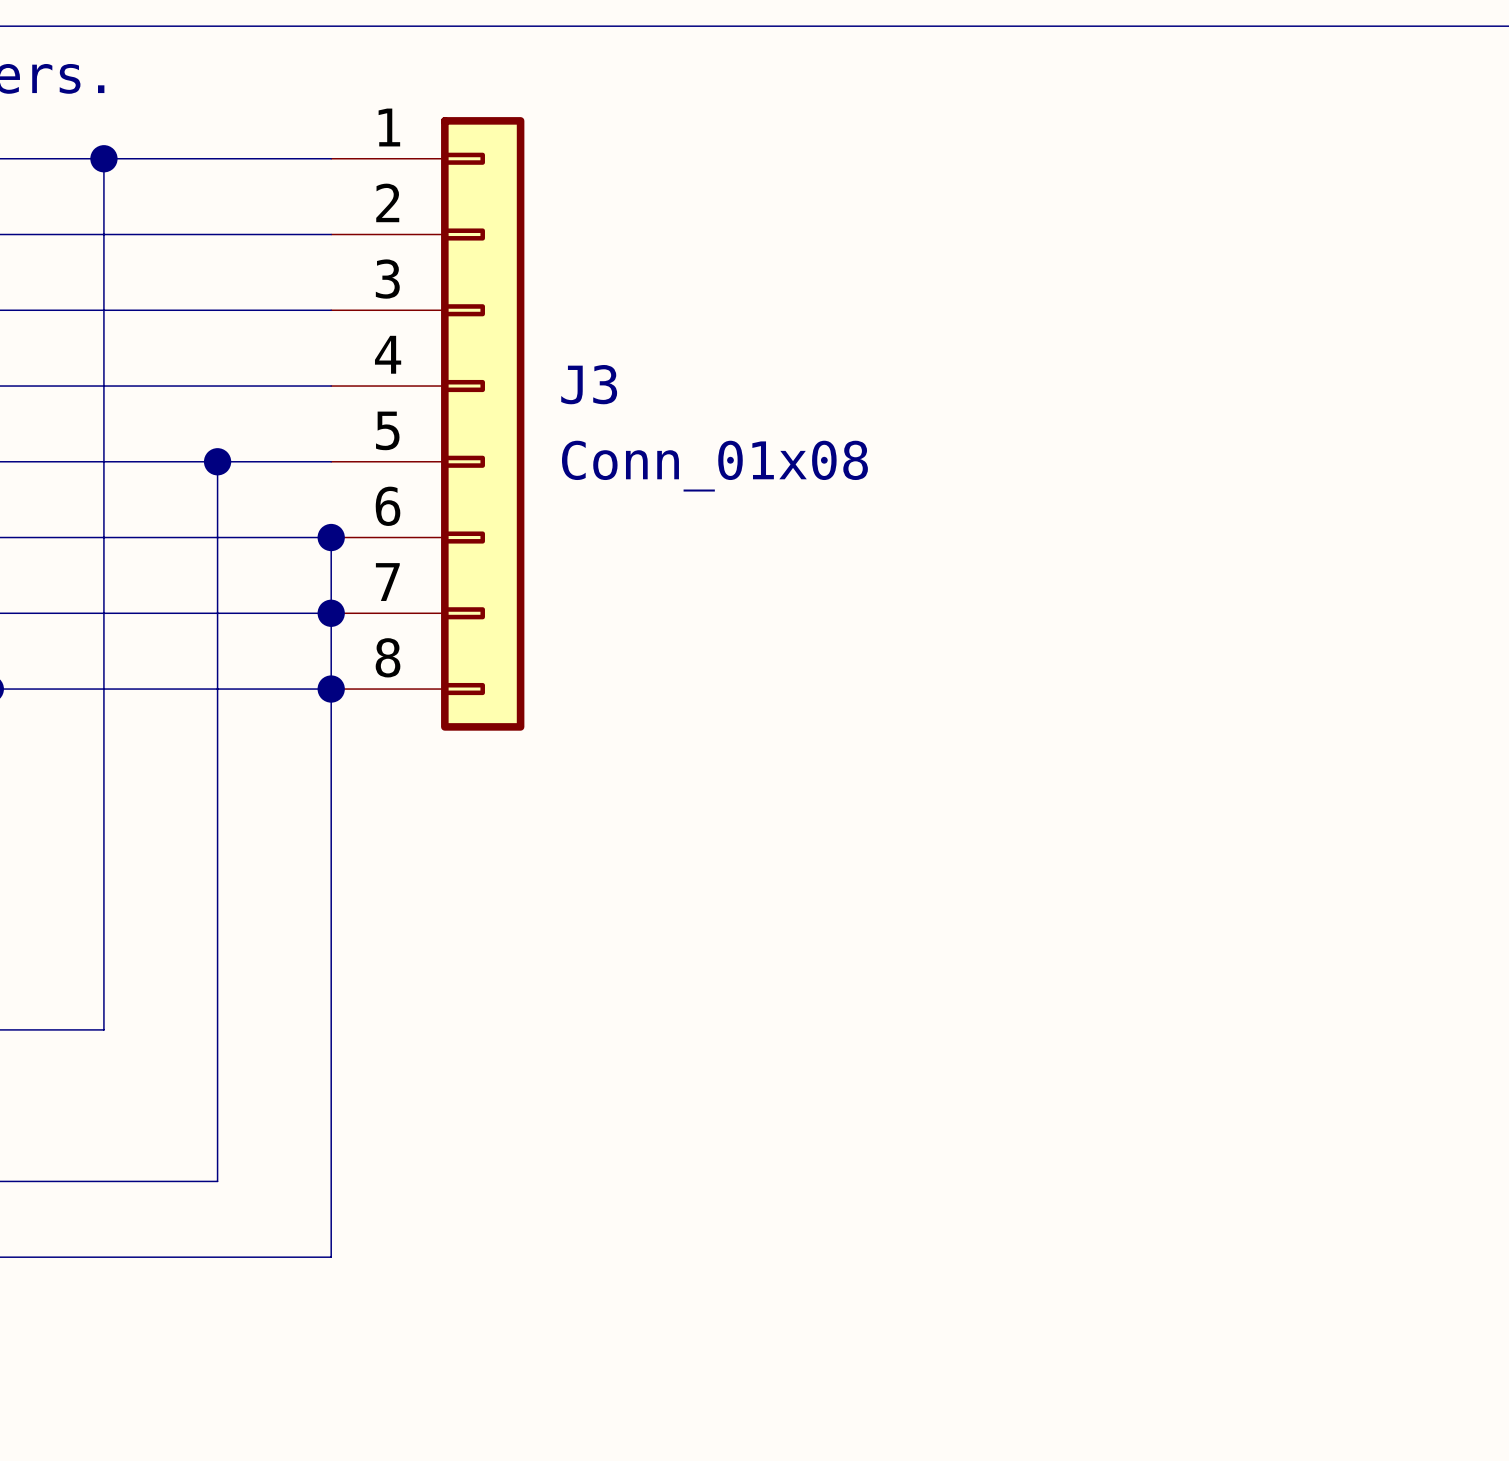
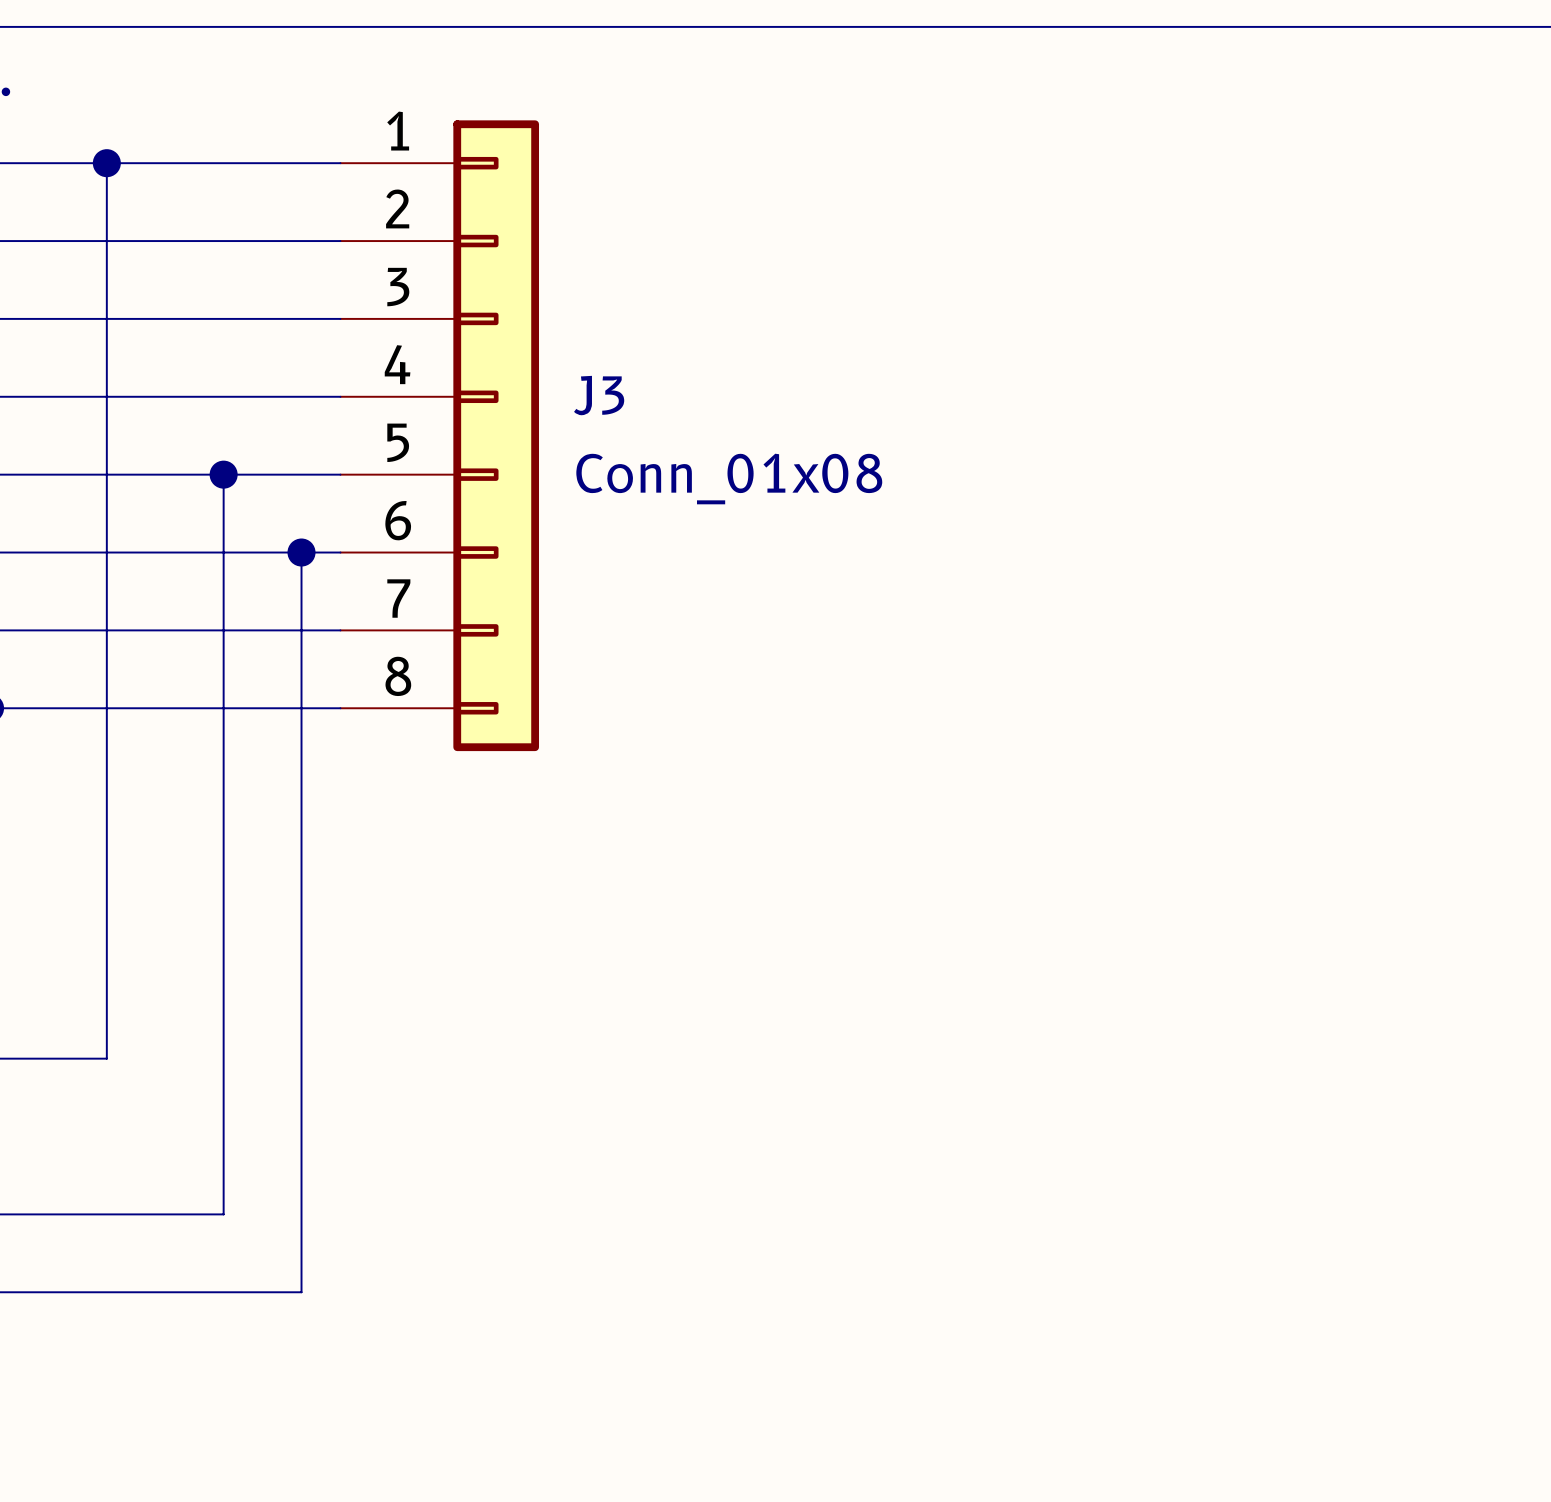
wire: (331, 537) (331, 1257) (293, 1257) -> (301, 552) (301, 1292)
junction position: (331, 537) -> (301, 552)
junction: (331, 613) -> none
junction: (331, 689) -> none

